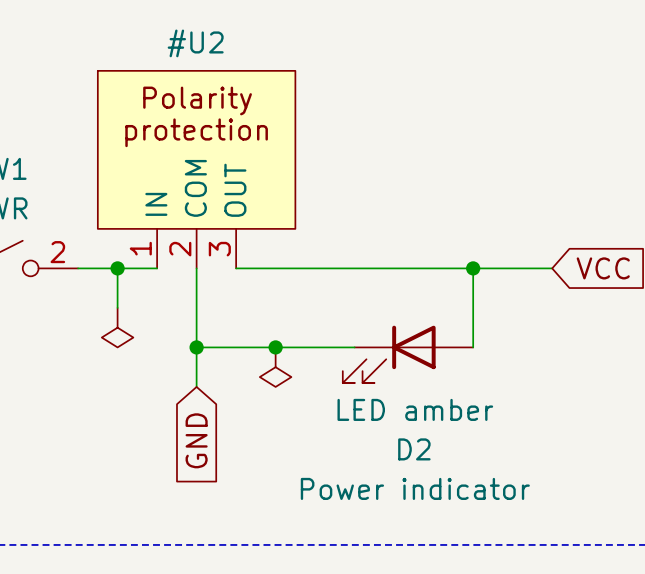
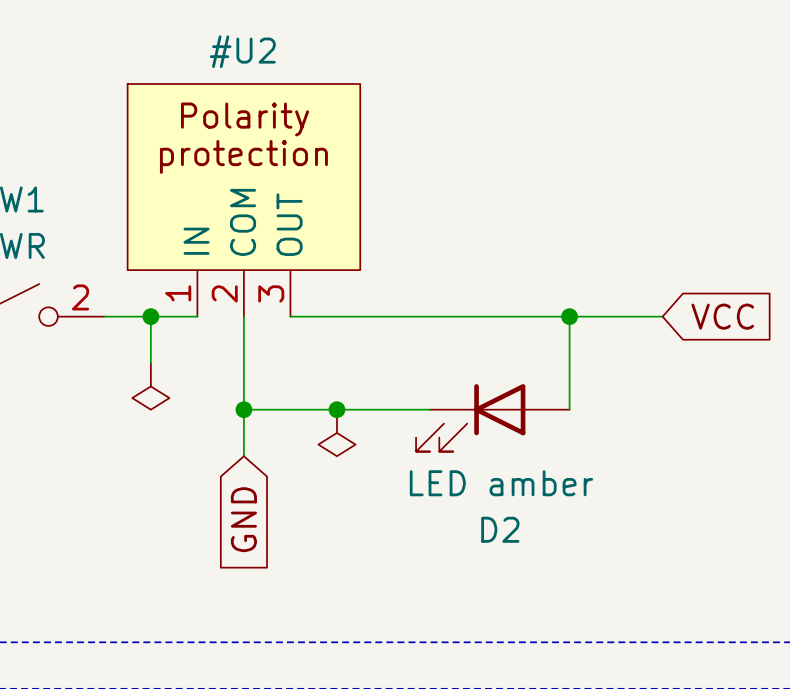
D2 text: Power indicator (415, 488) -> none

